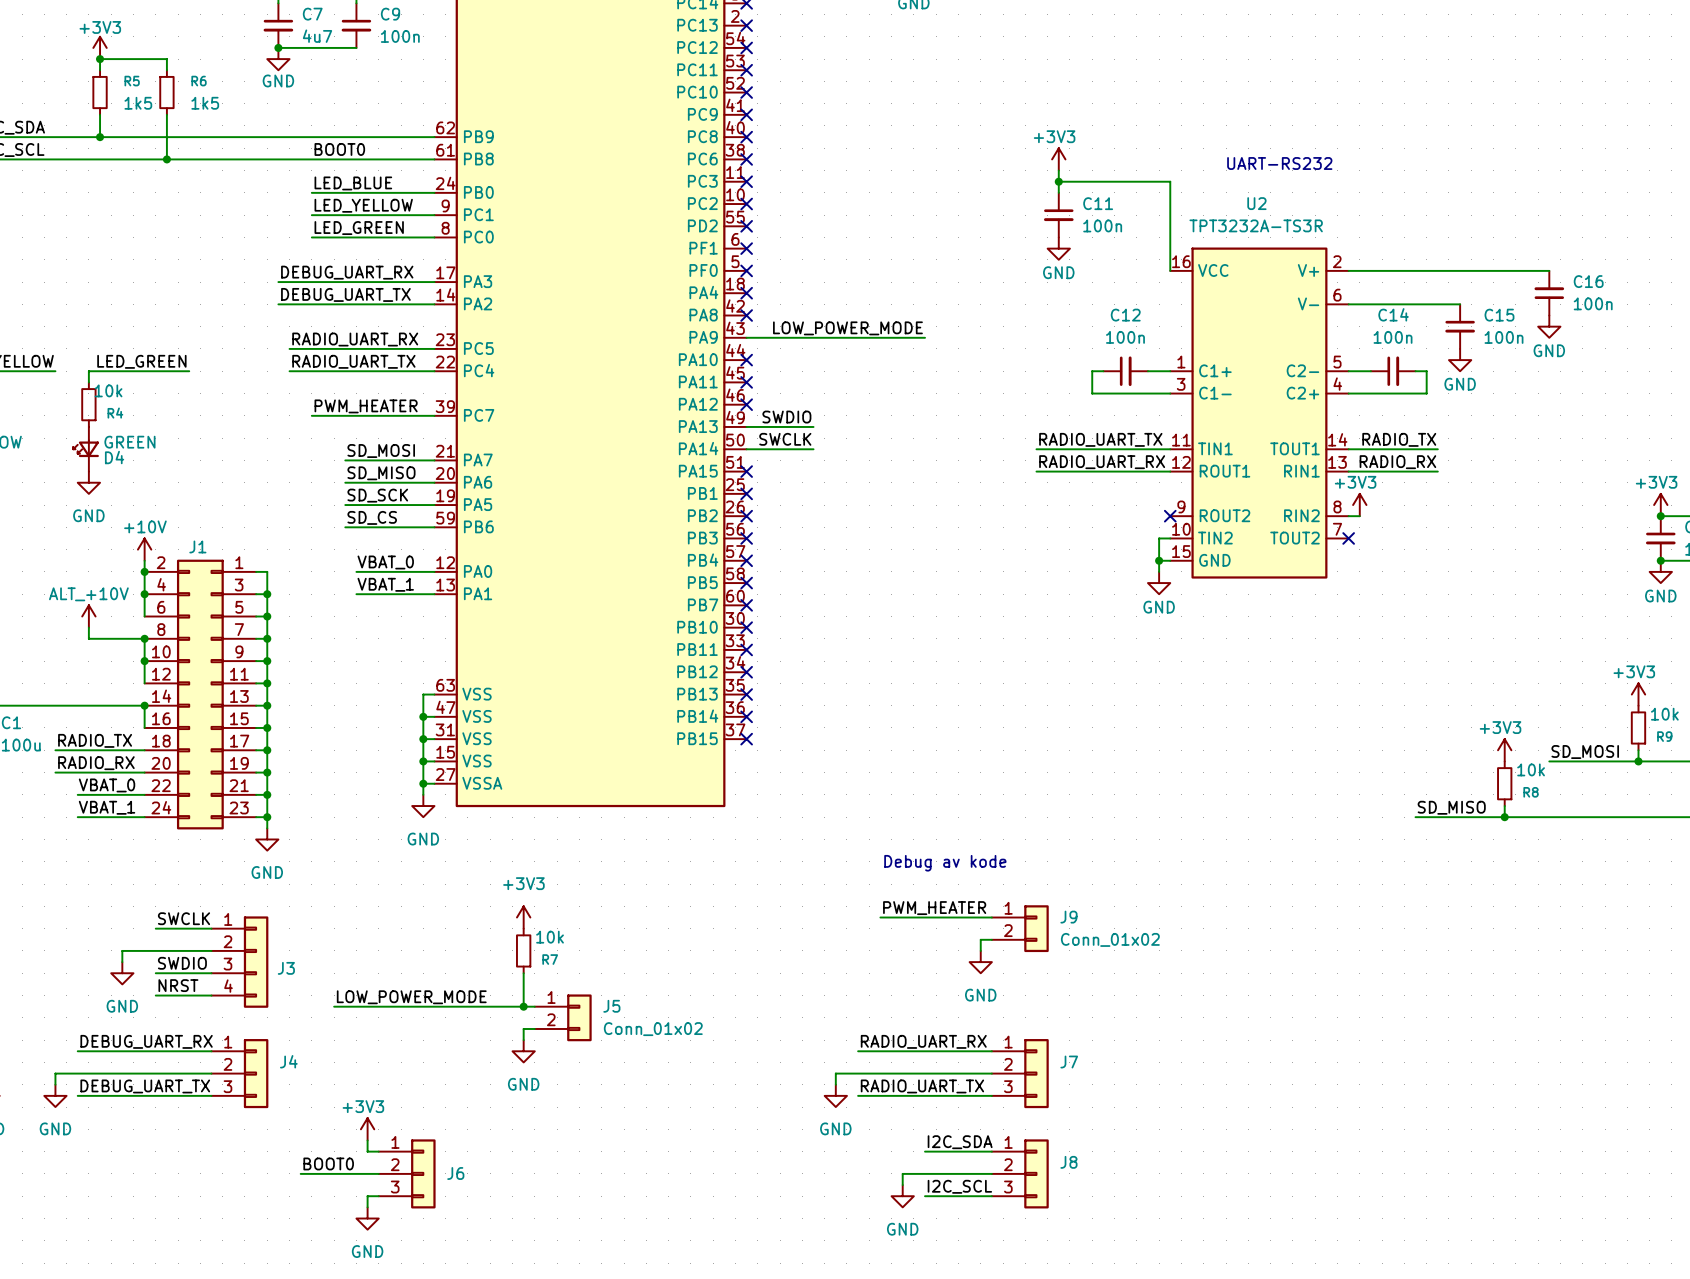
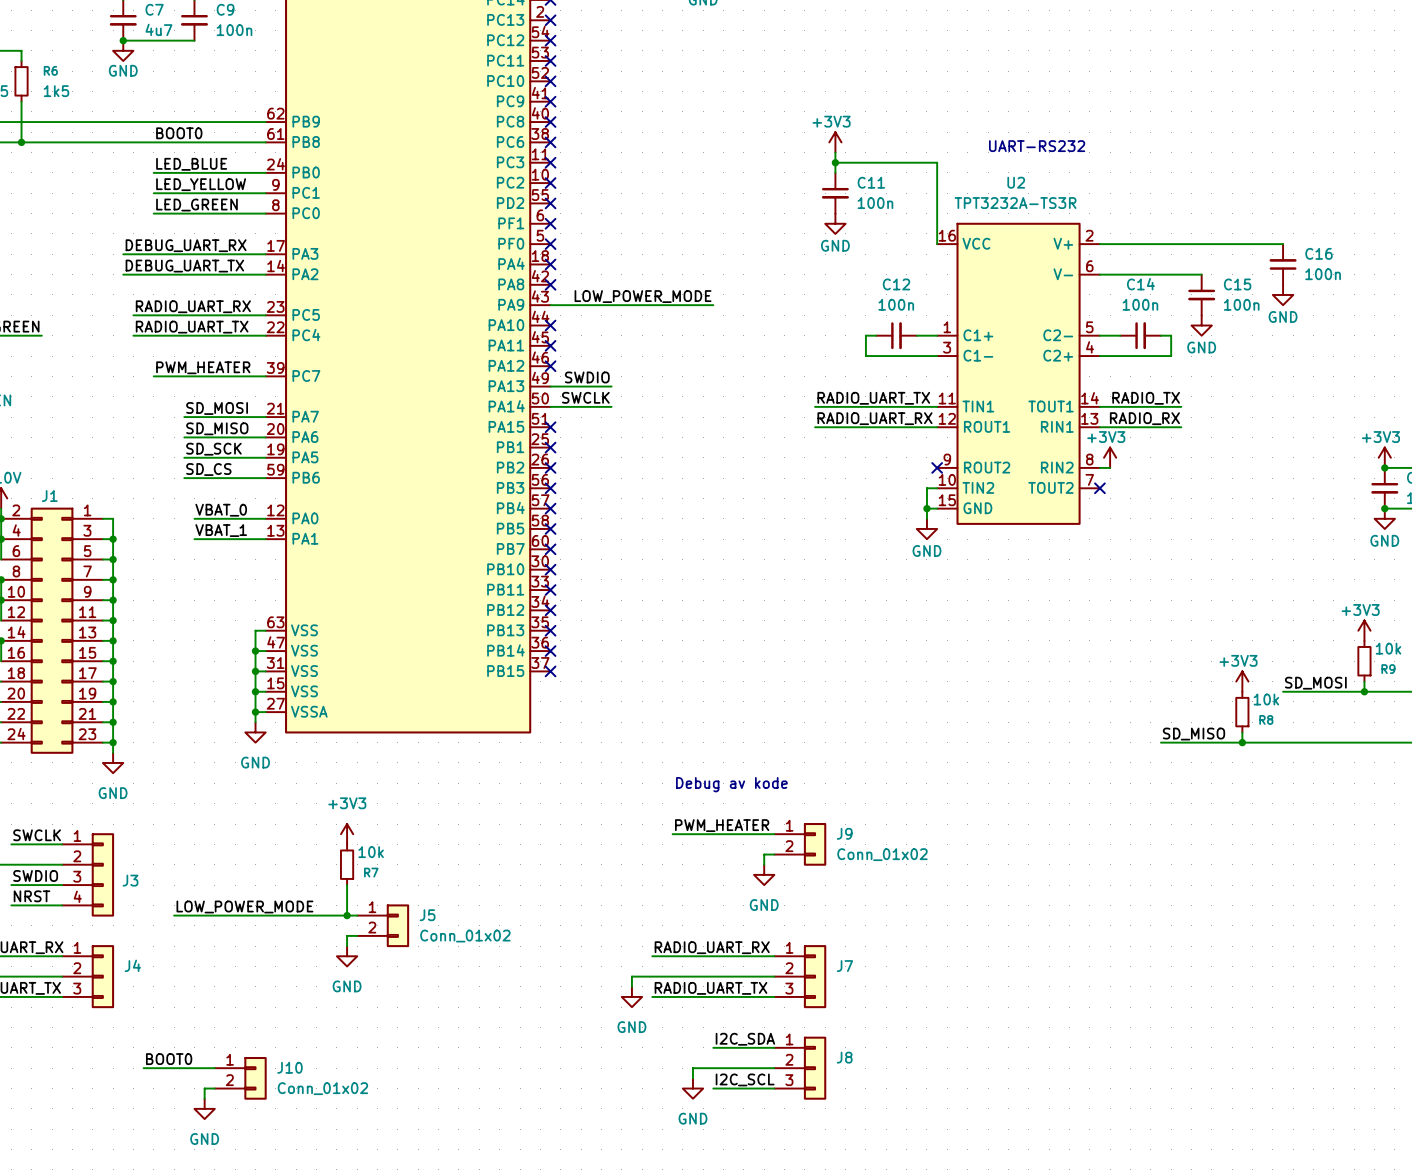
power symbol: +3V3 (367, 1129) -> none
wire: (367, 1140) (367, 1151) (378, 1151) -> none
J6: (407, 1173) -> none
J10: none -> Conn_01x02 (240, 1078)

